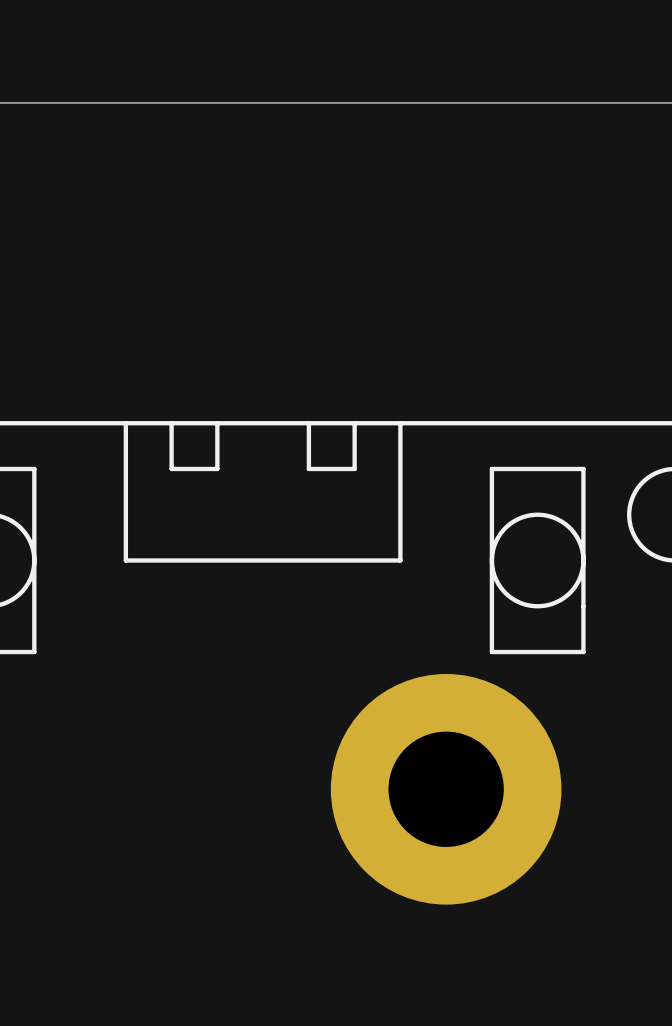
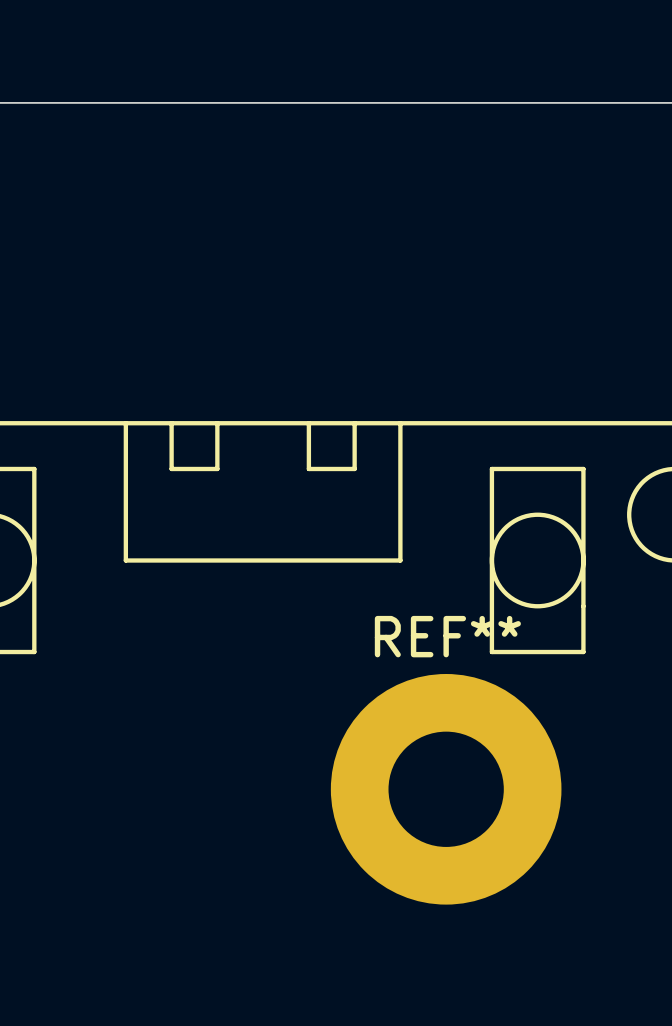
REF** name: none -> REF** (447, 636)

